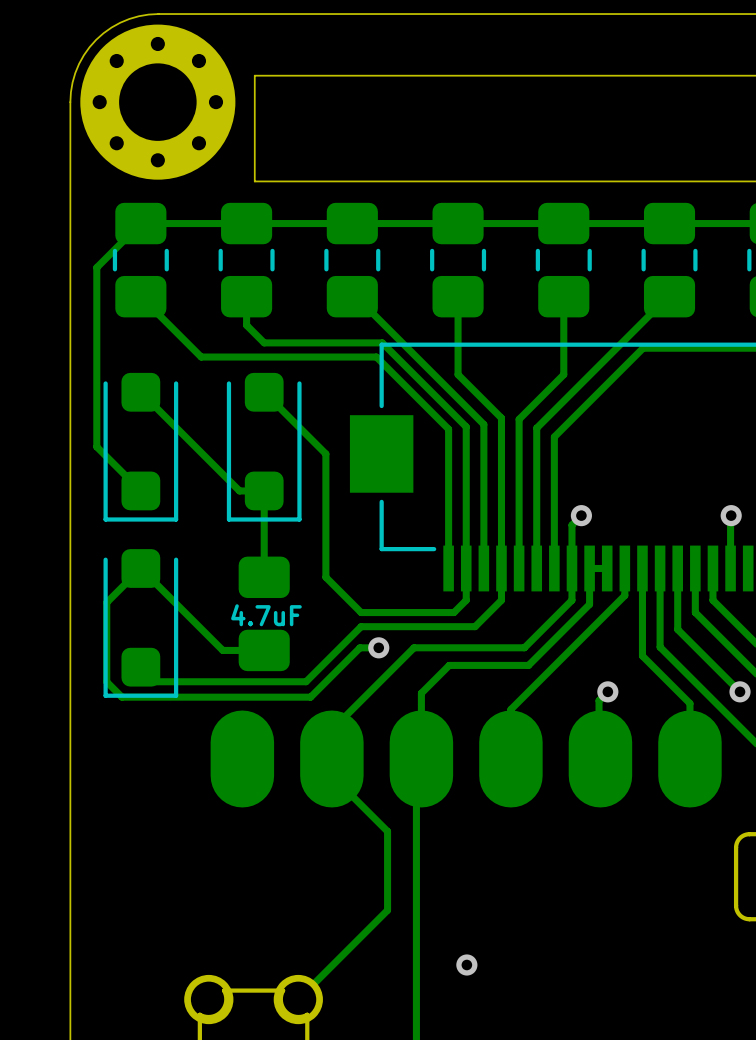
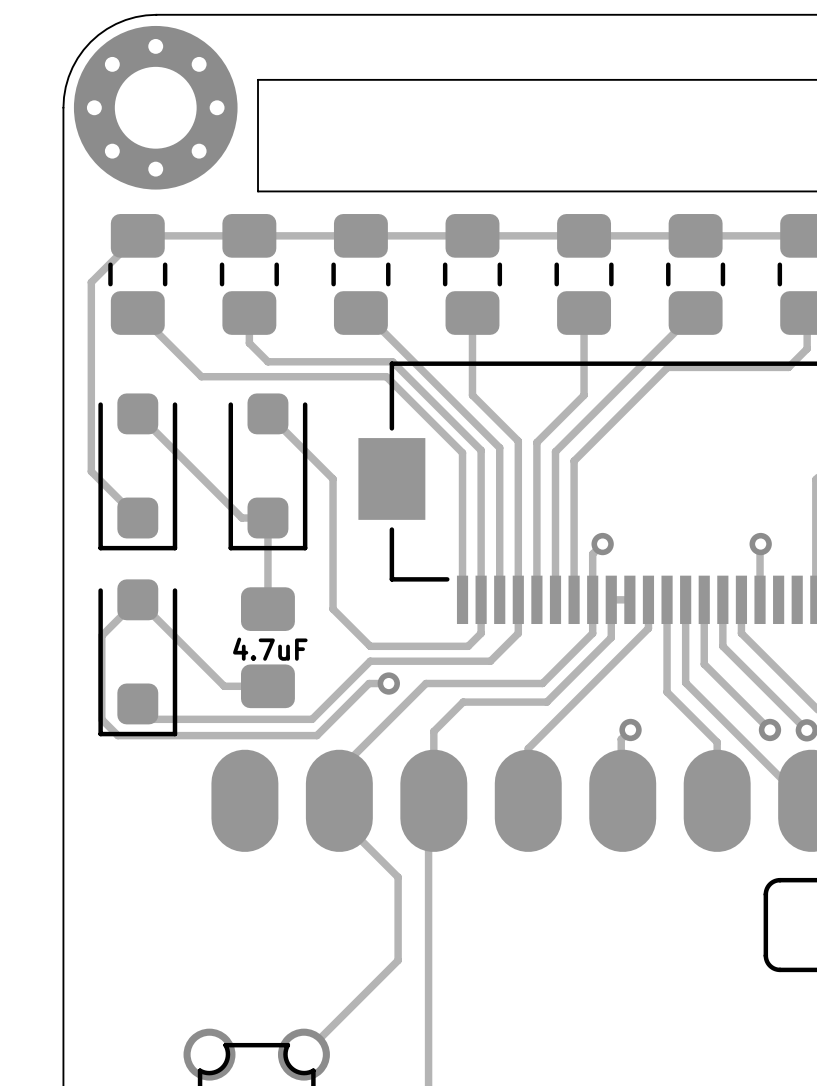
via: (466, 964) -> none

